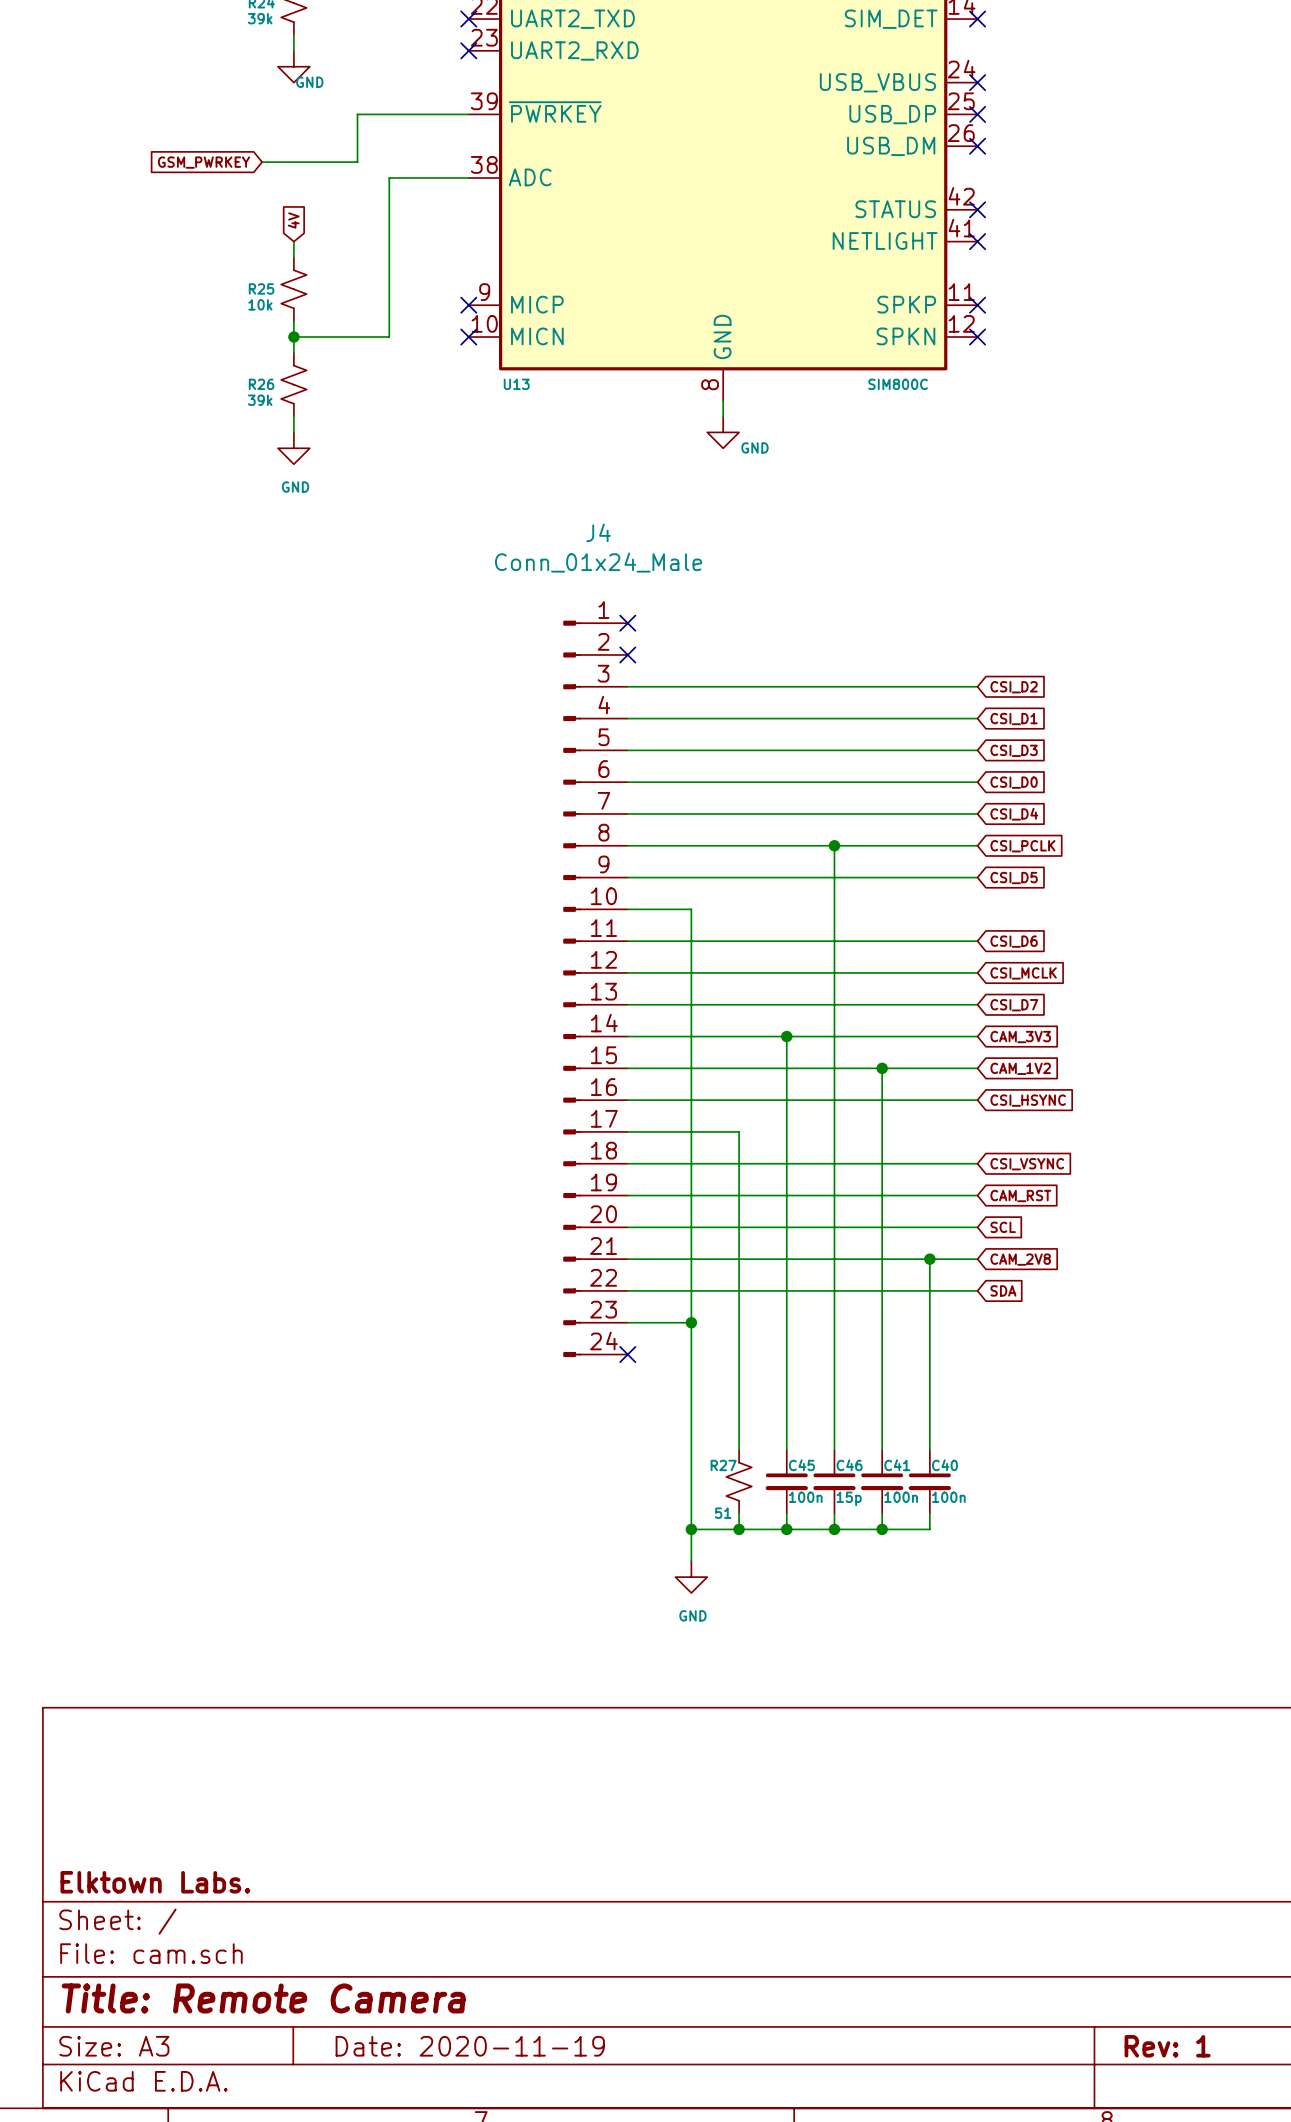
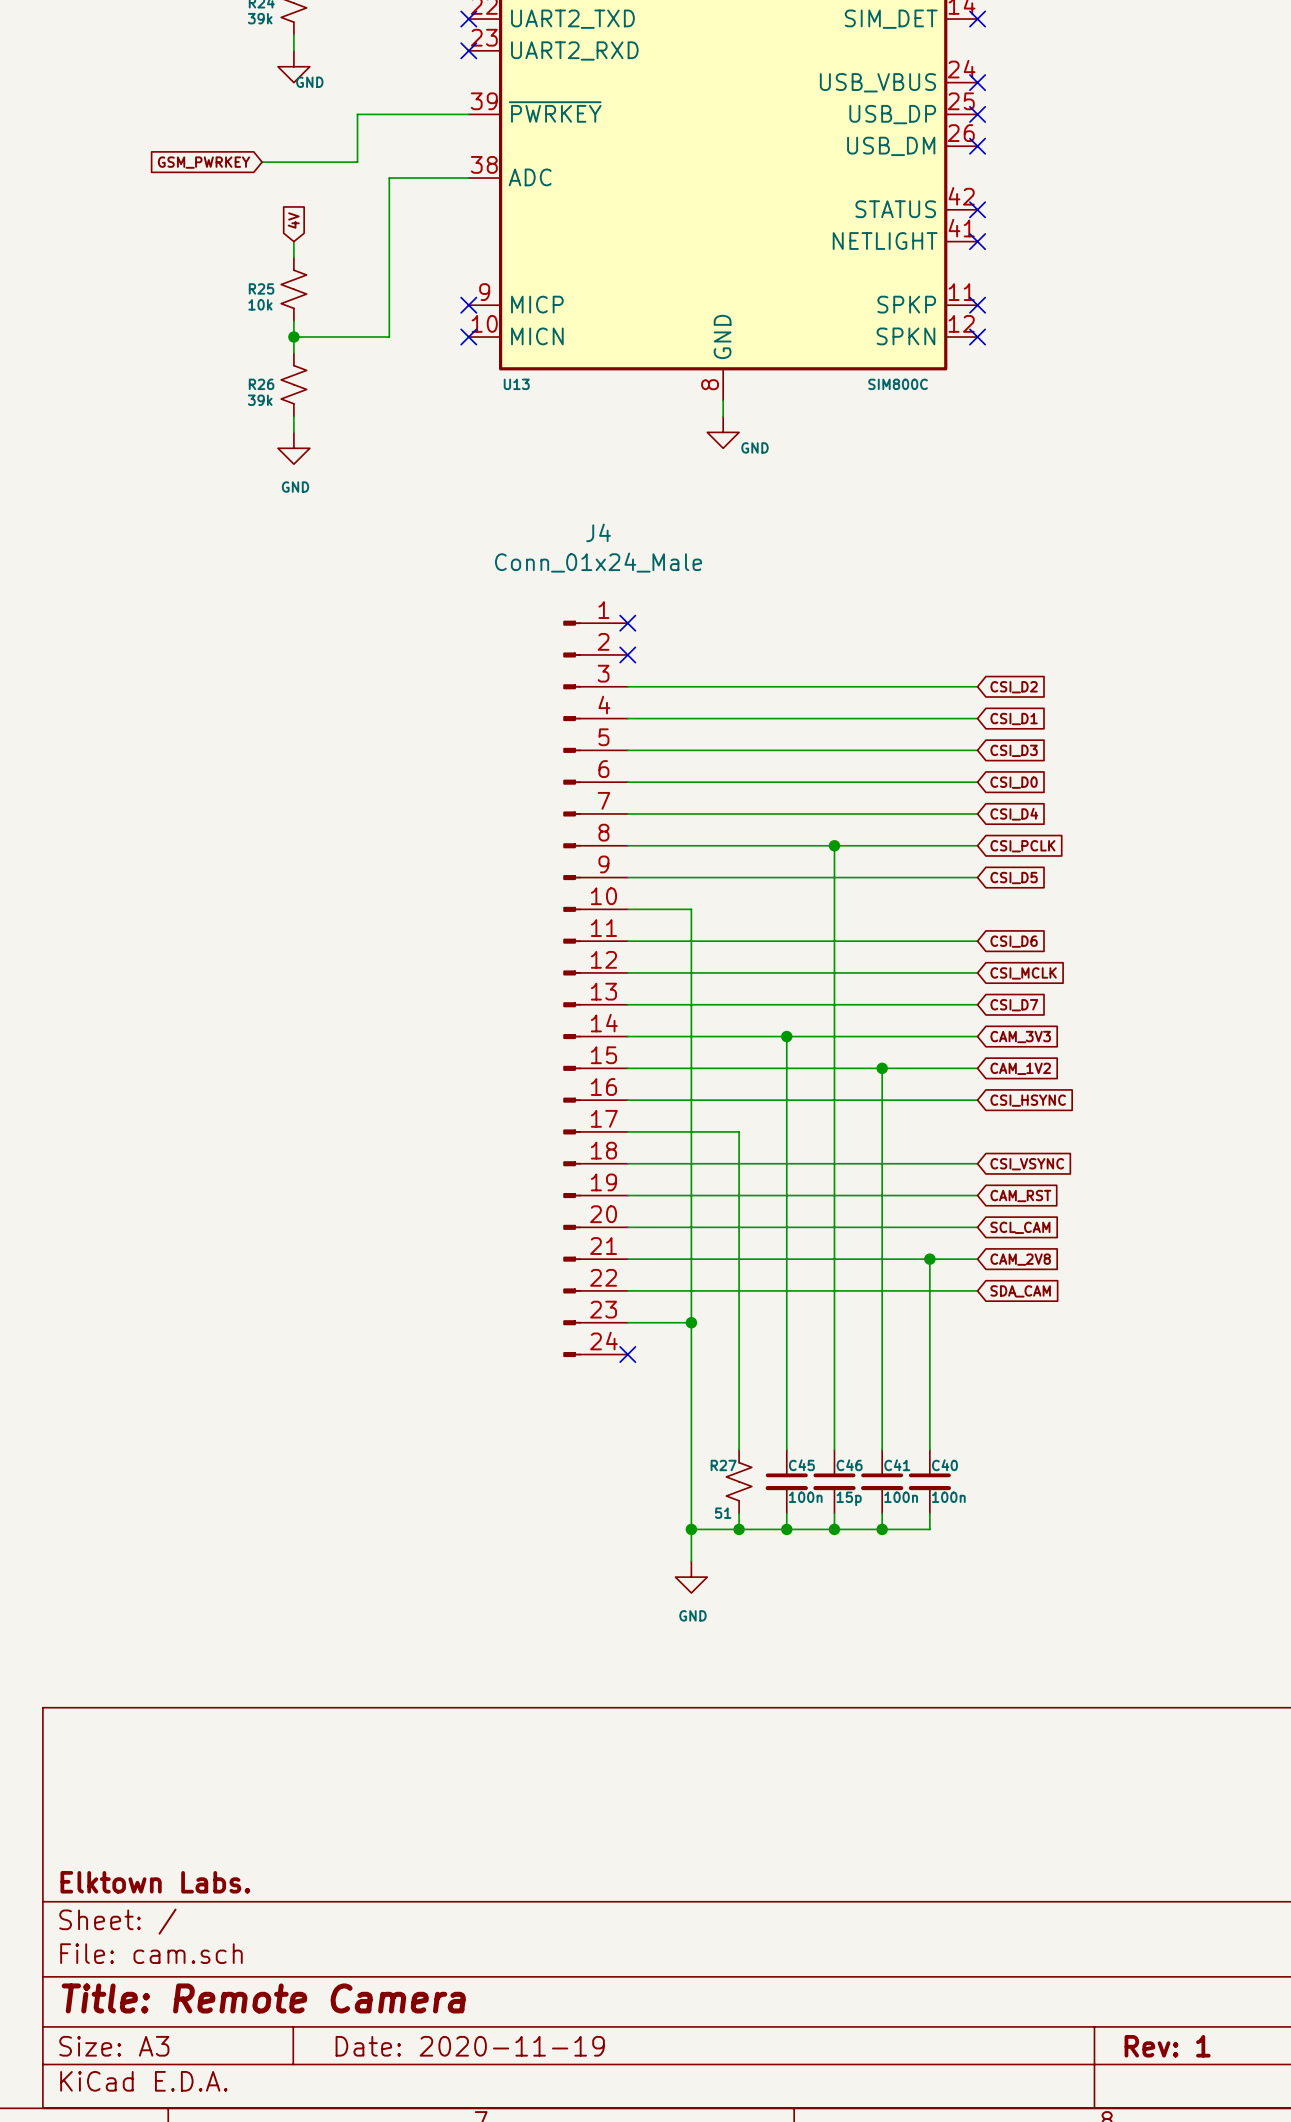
global label: SCL (1003, 1227) -> SCL_CAM (1020, 1227)
global label: SDA (1003, 1290) -> SDA_CAM (1020, 1291)

